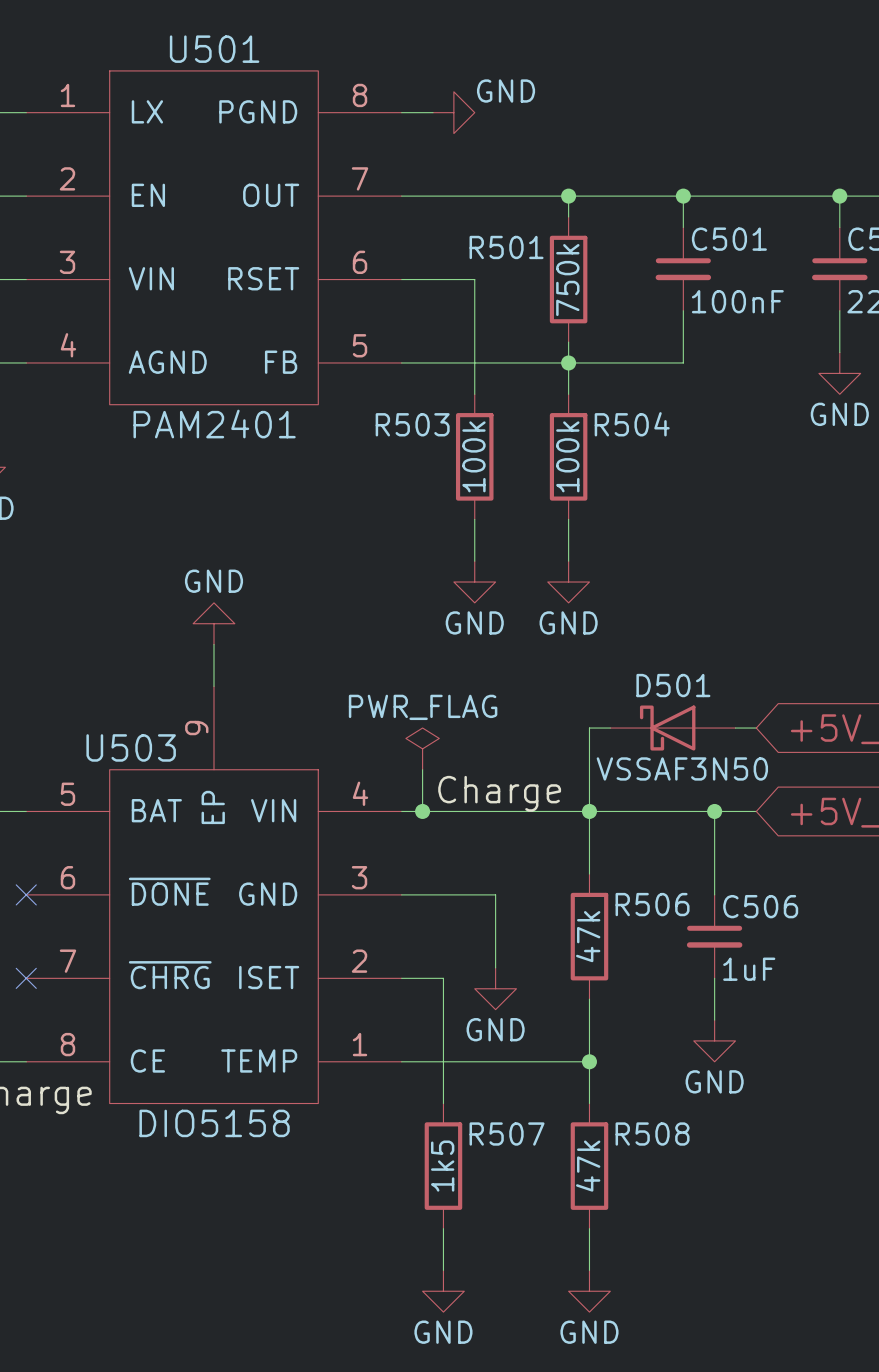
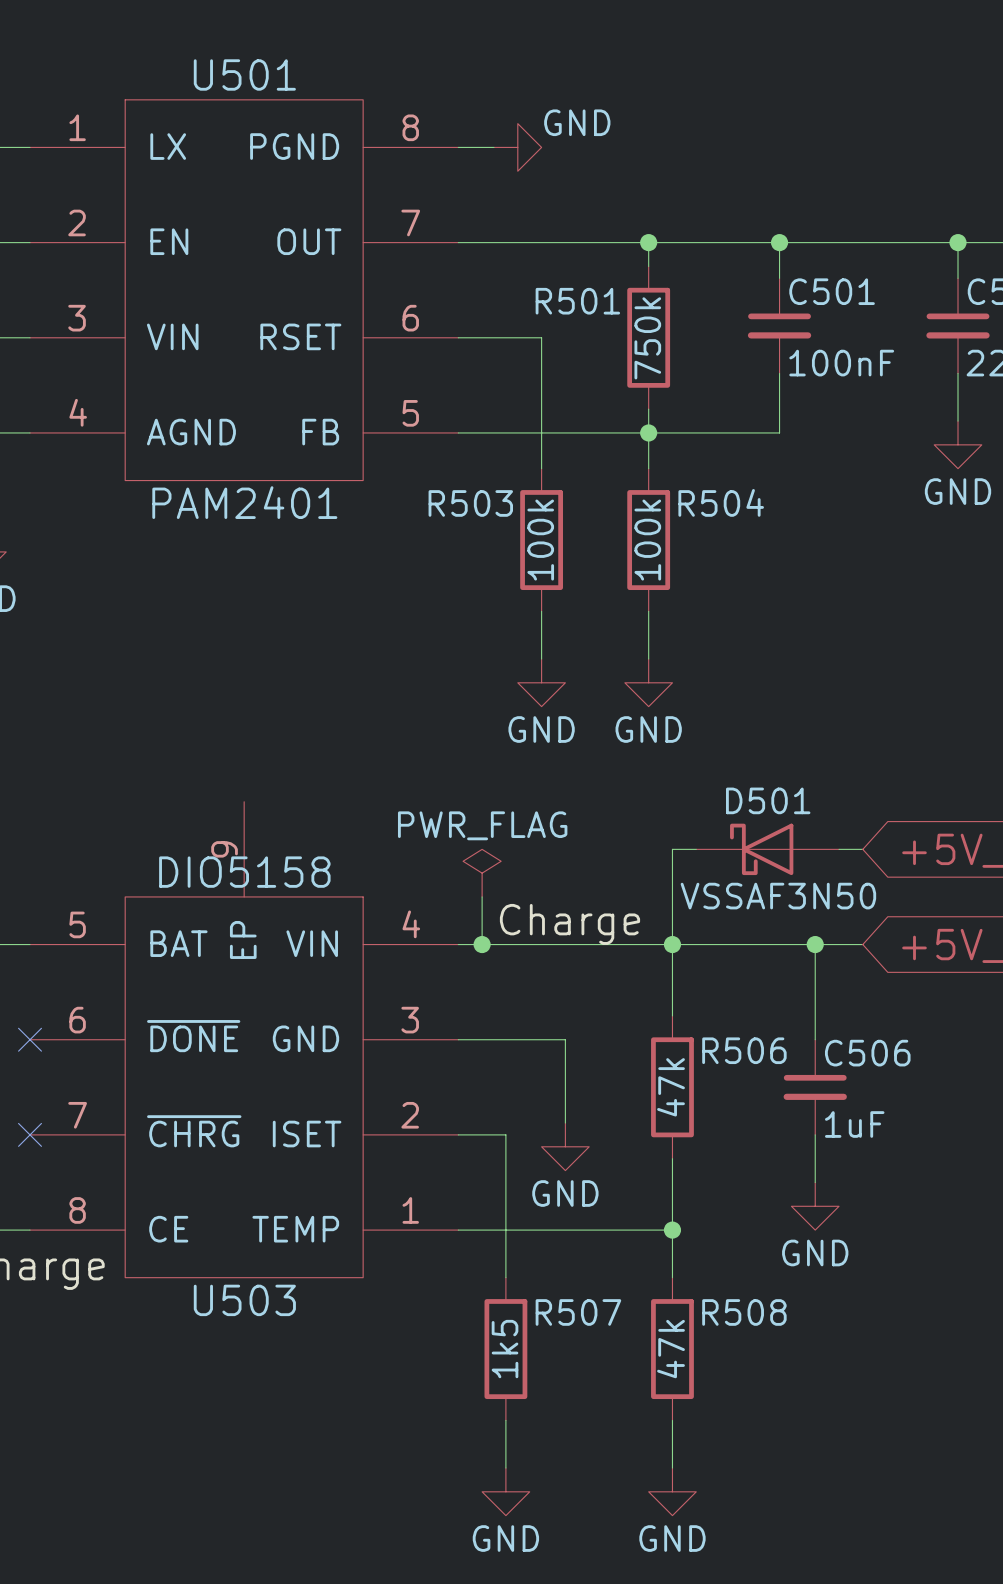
power symbol: GND (213, 623) -> none
wire: (213, 644) (213, 686) -> none
U503 name position: U503 (131, 747) -> U503 (244, 1300)
U503 value position: DIO5158 (214, 1123) -> DIO5158 (244, 872)

